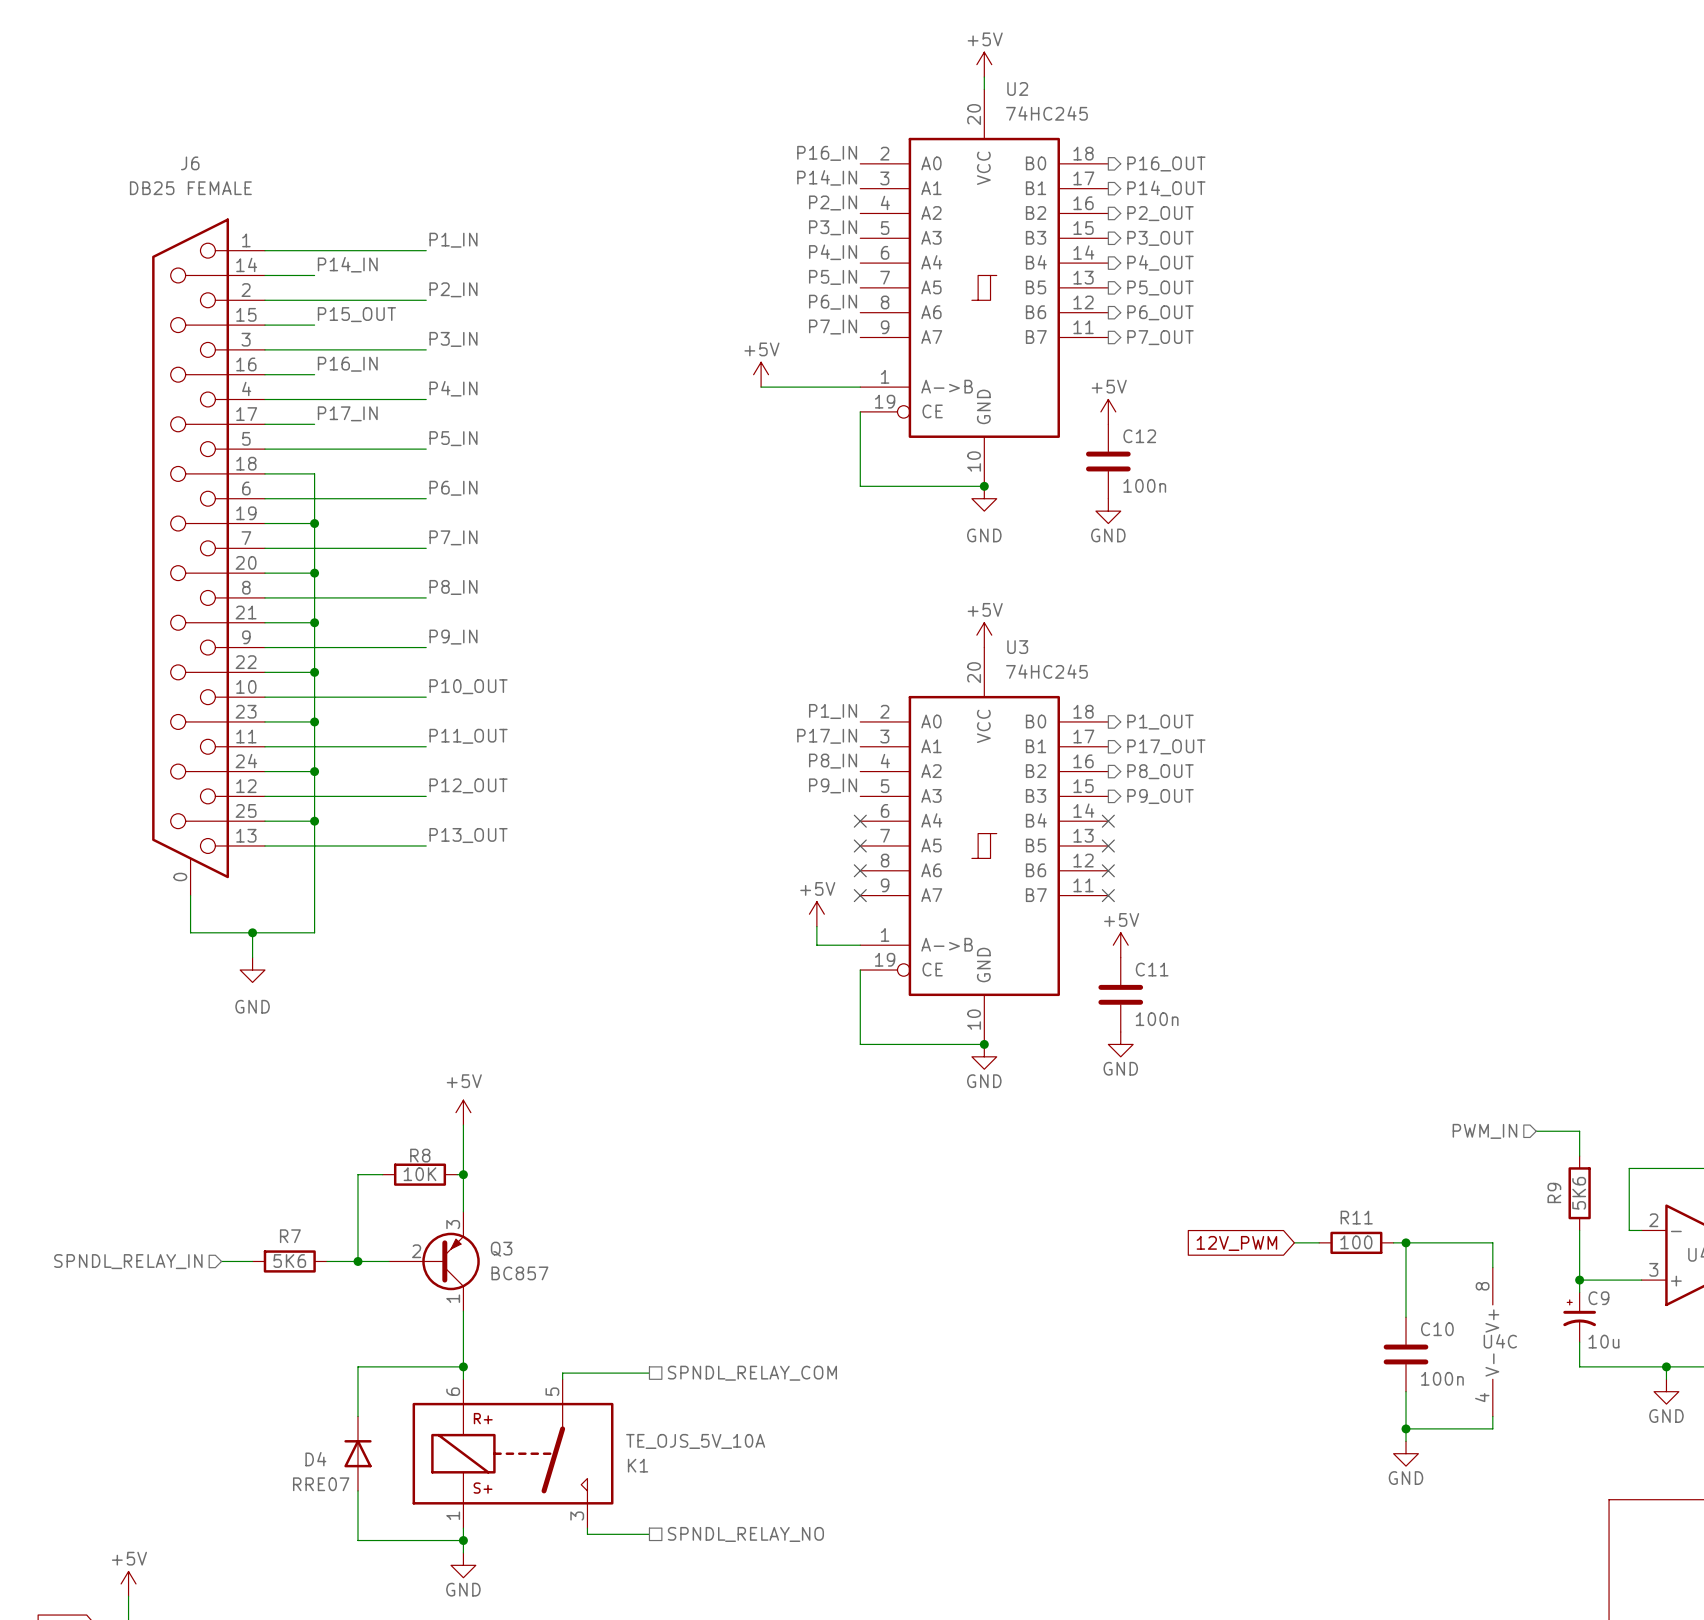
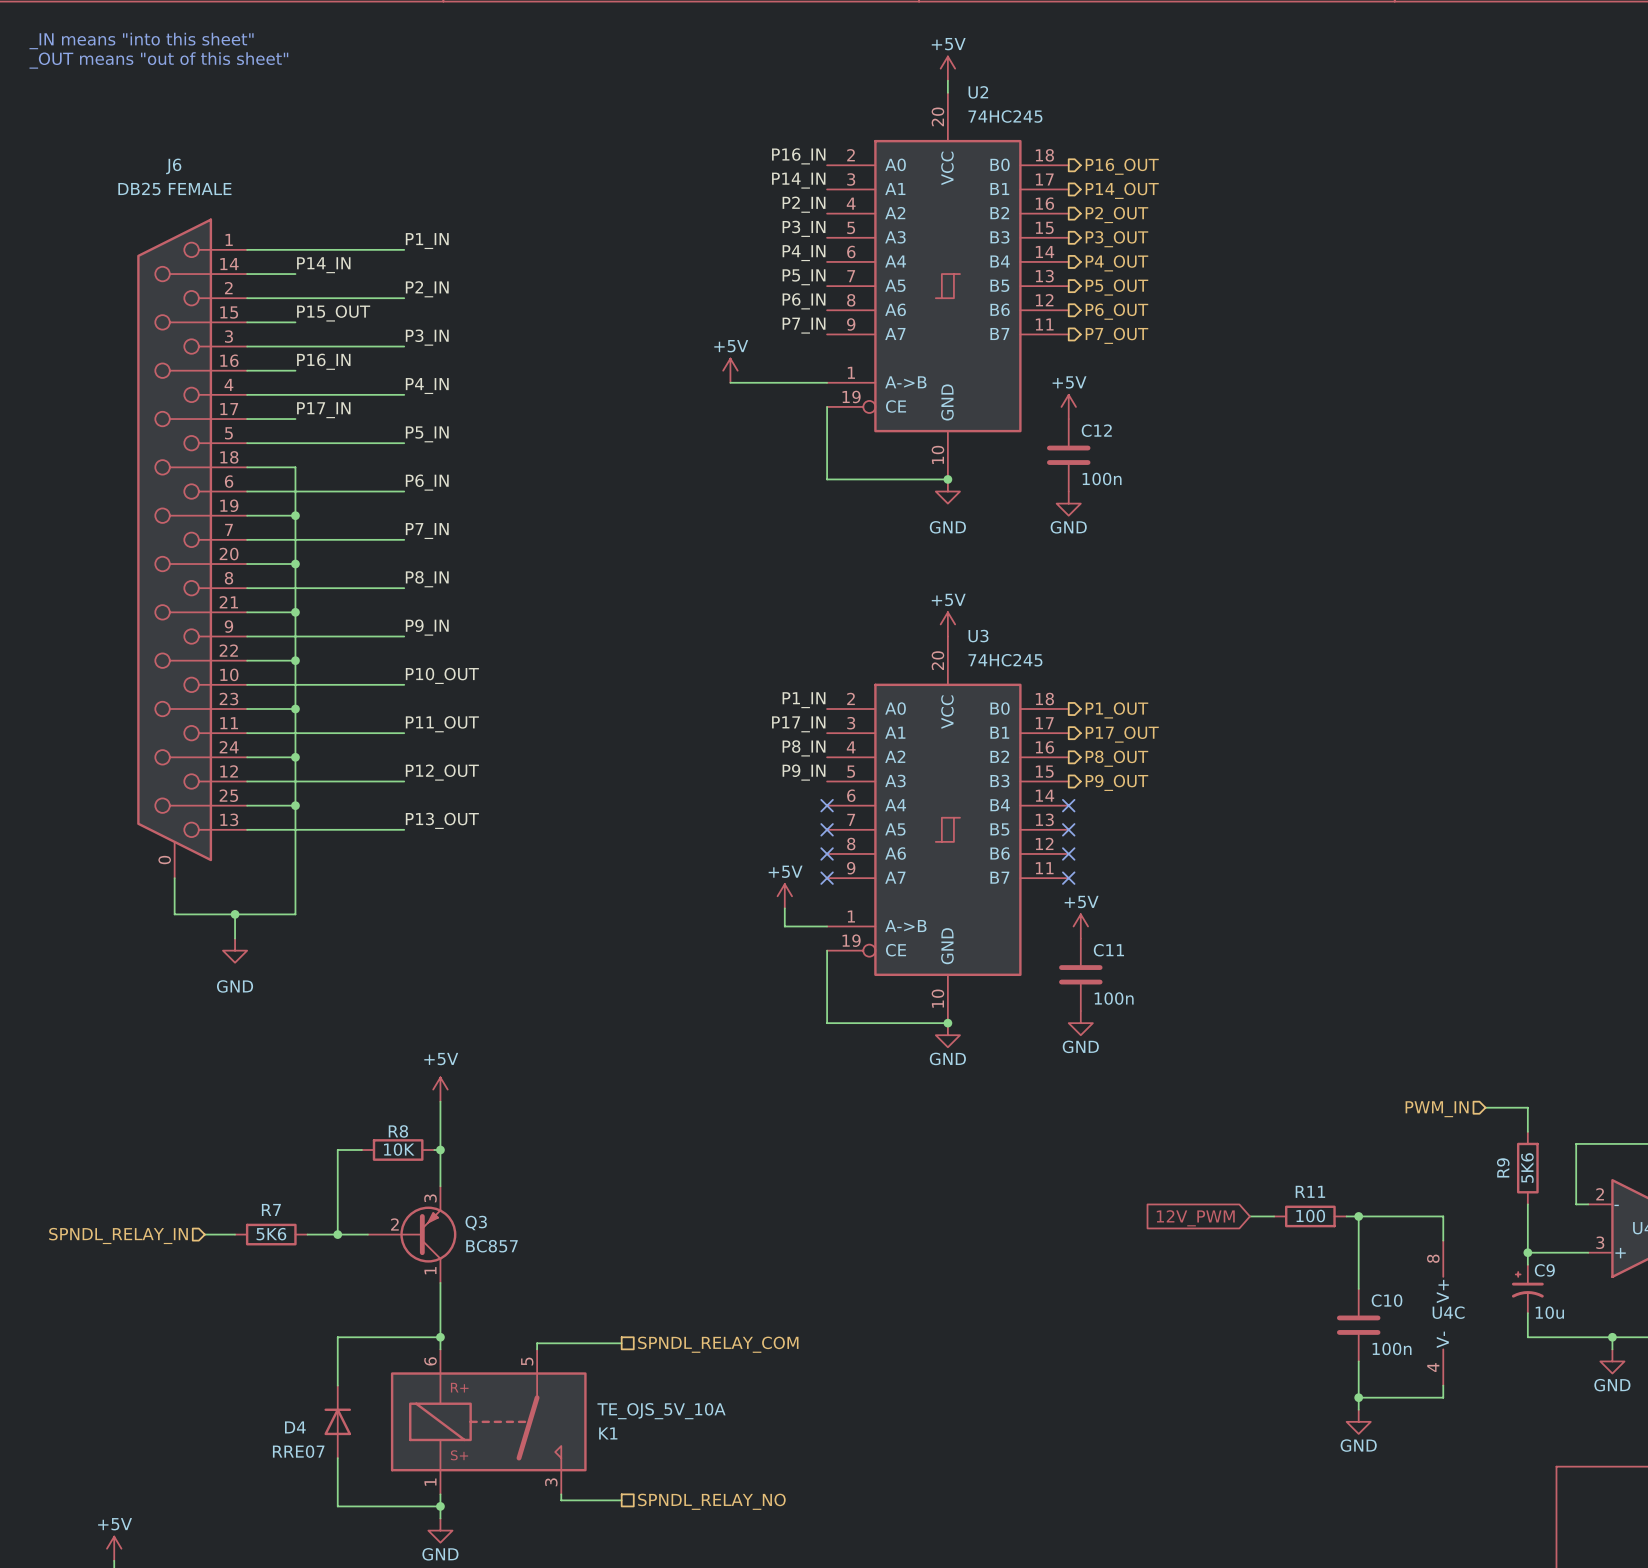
text: none -> _IN means "into this sheet" (141, 40)
text: none -> _OUT means "out of this sheet" (158, 60)

